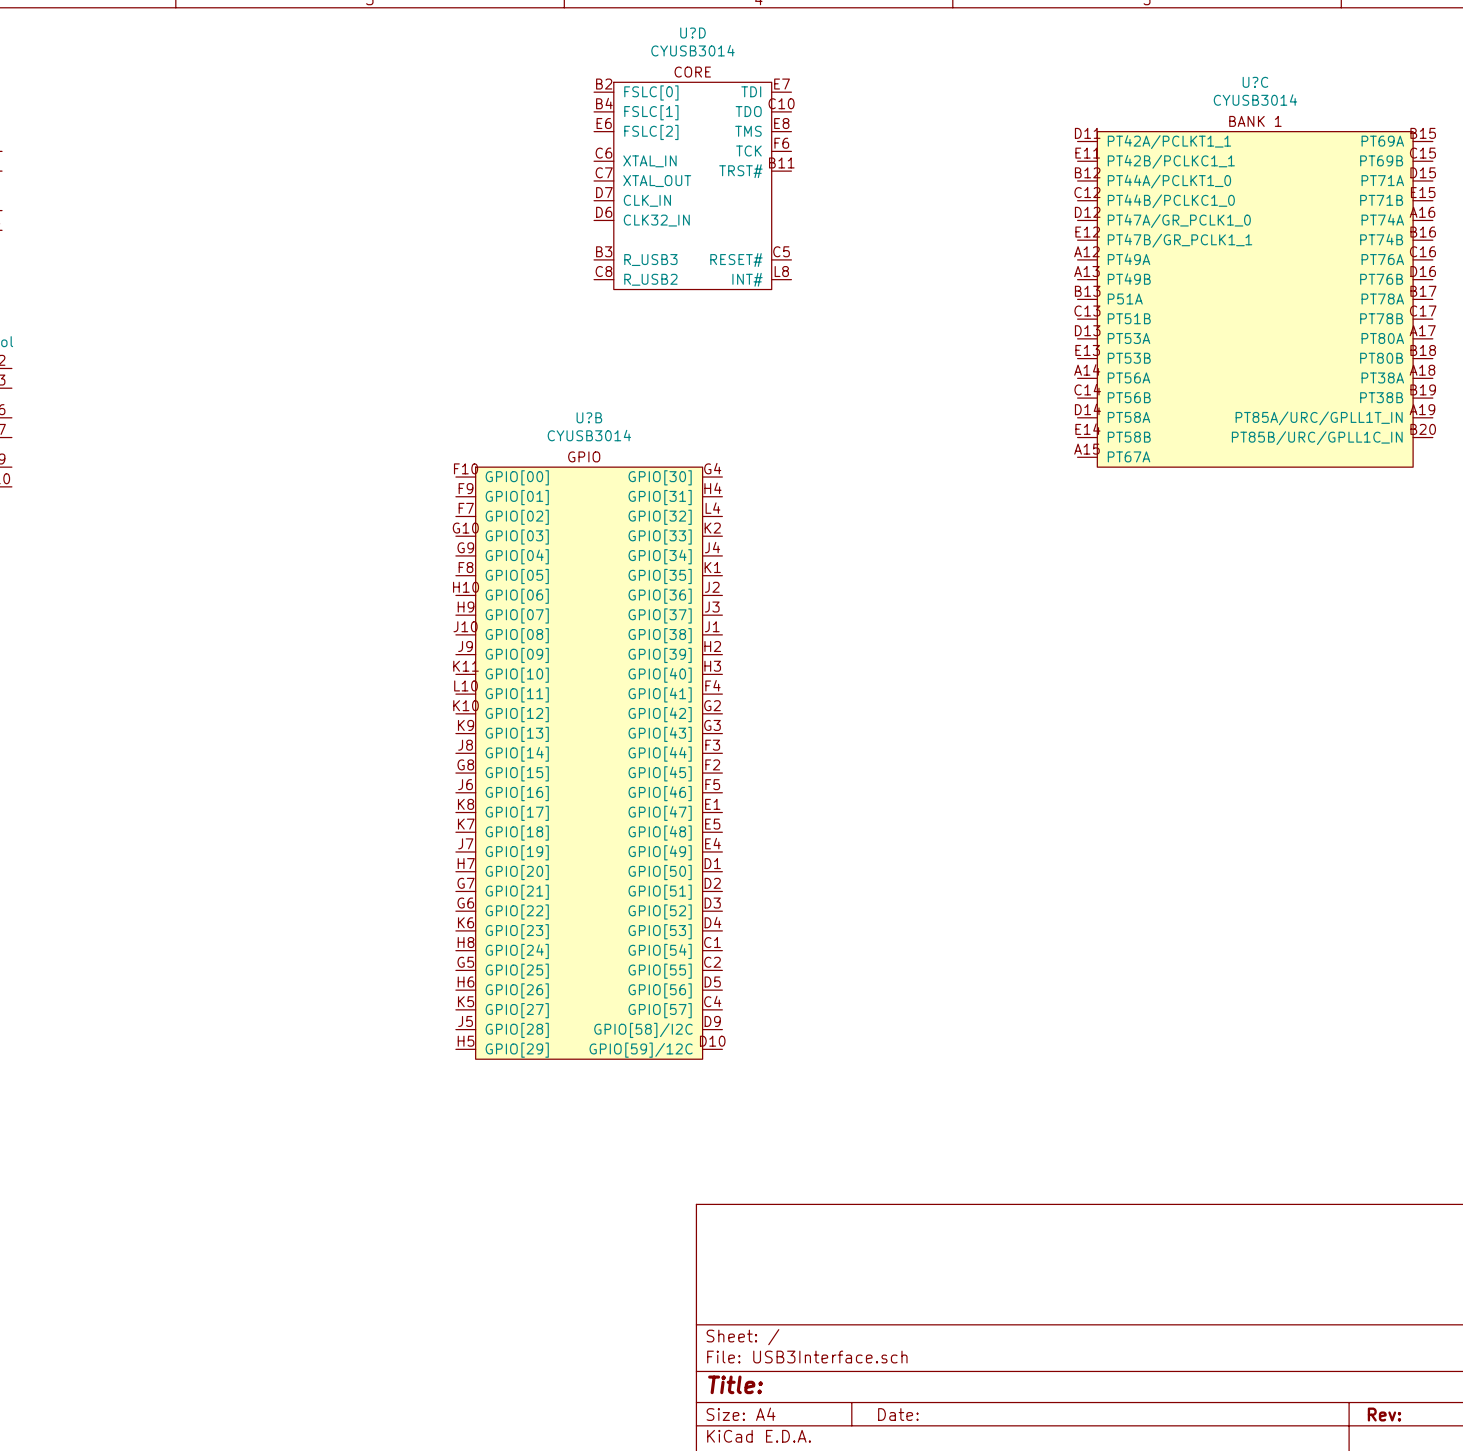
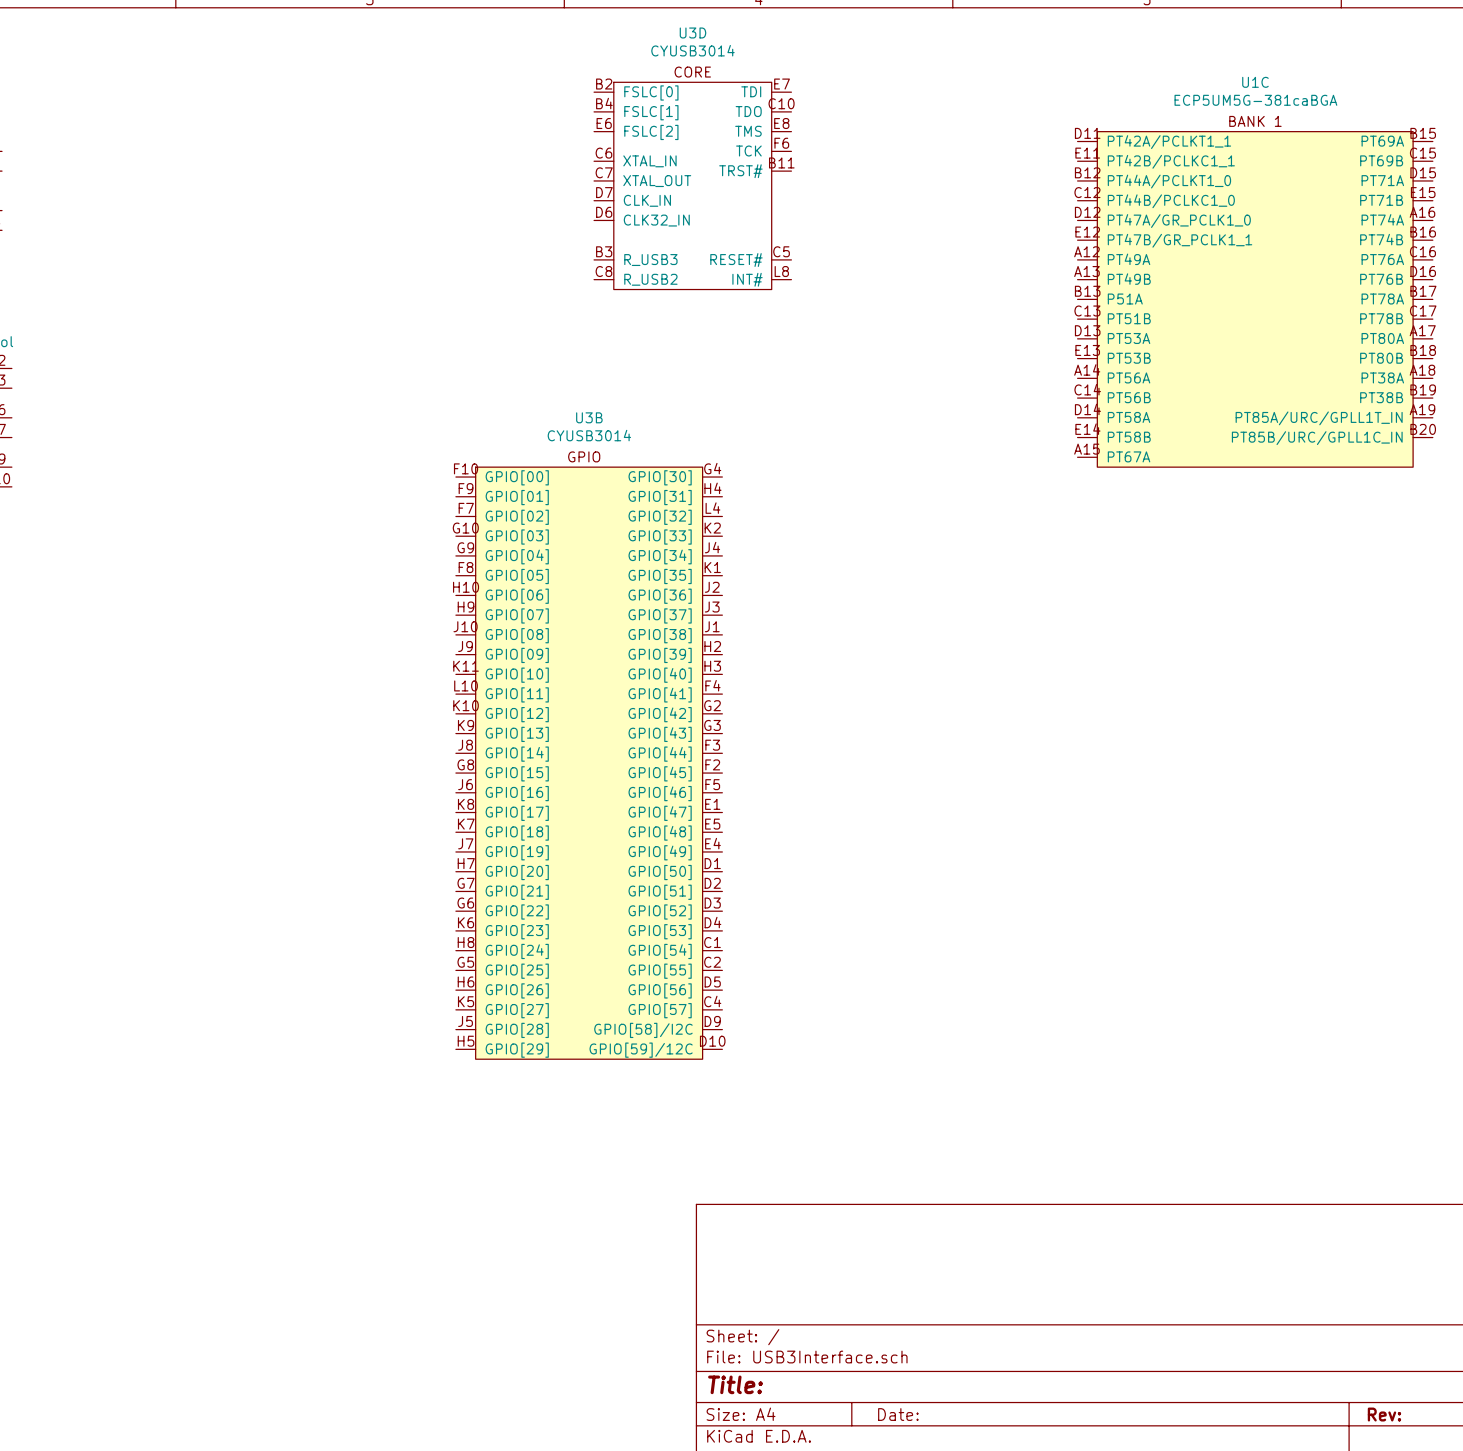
U?D name: U?D (692, 32) -> U3D (692, 32)
U?C name: U?C (1255, 82) -> U1C (1255, 82)
U?C value: CYUSB3014 (1255, 100) -> ECP5UM5G-381caBGA (1255, 100)
U?B name: U?B (589, 417) -> U3B (589, 417)

